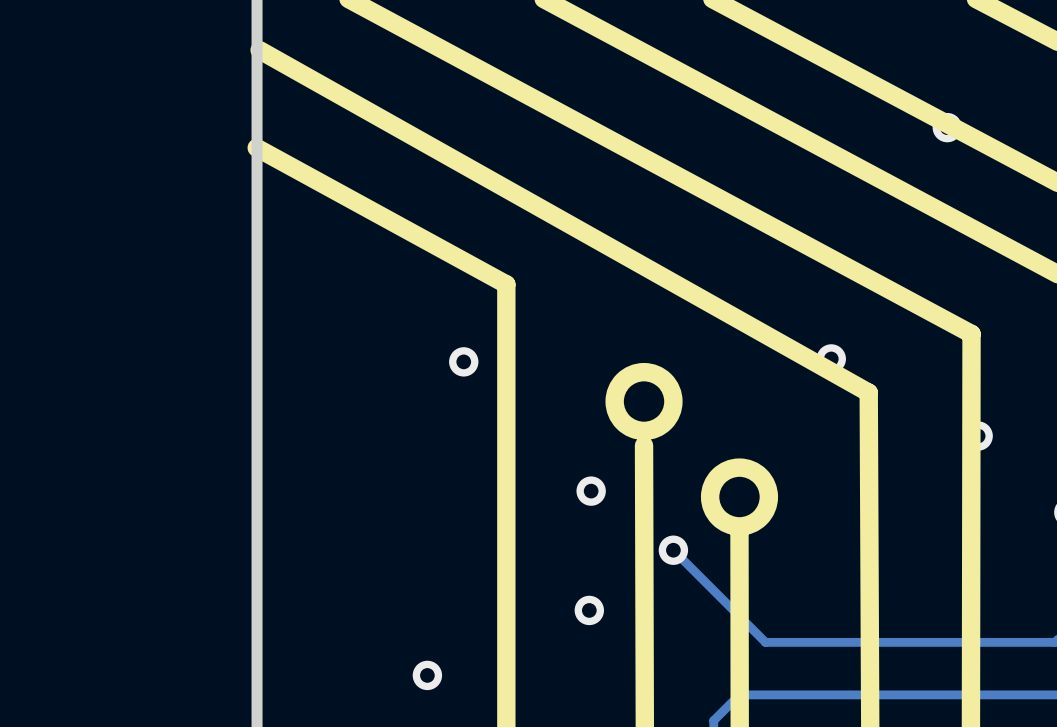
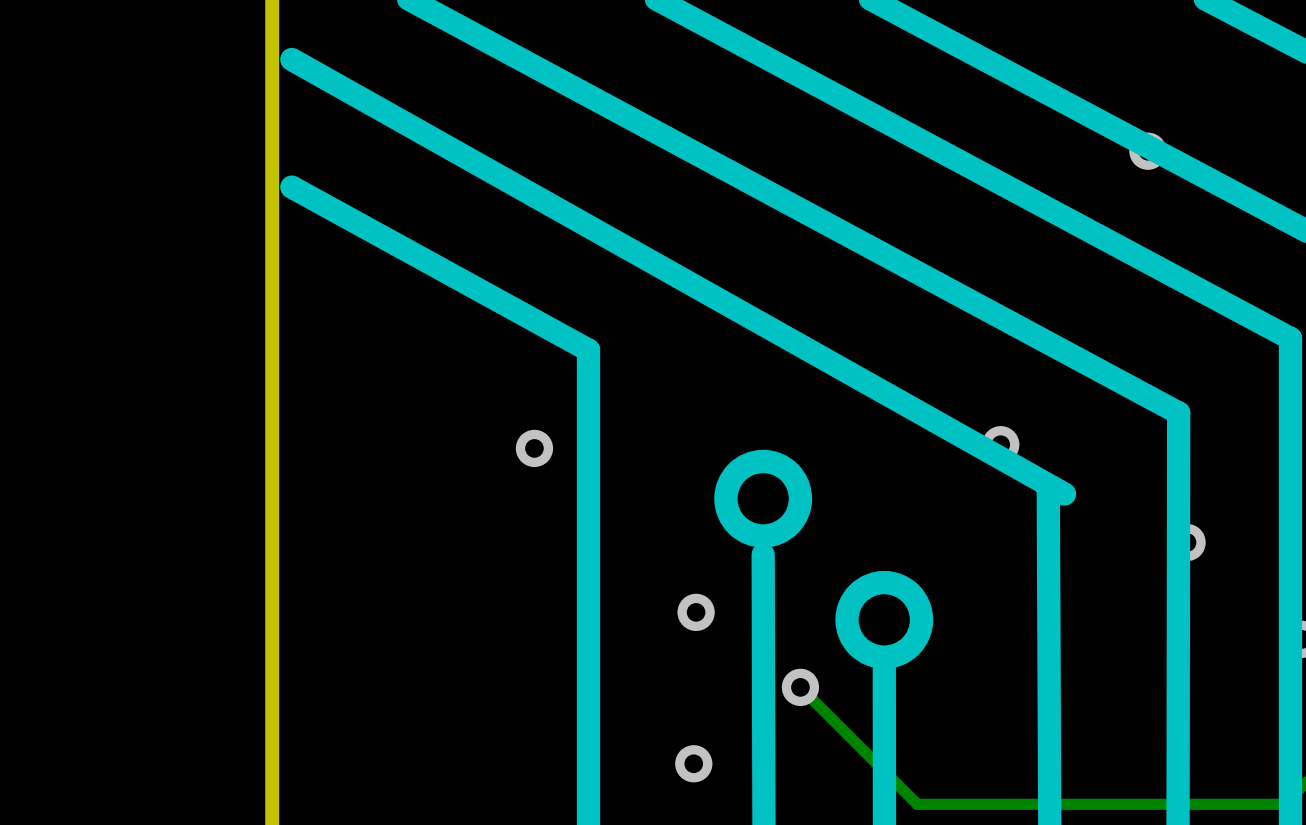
line: (259, 50) (868, 392) -> (291, 59) (1064, 494)
line: (256, 147) (506, 284) -> (291, 187) (588, 350)

